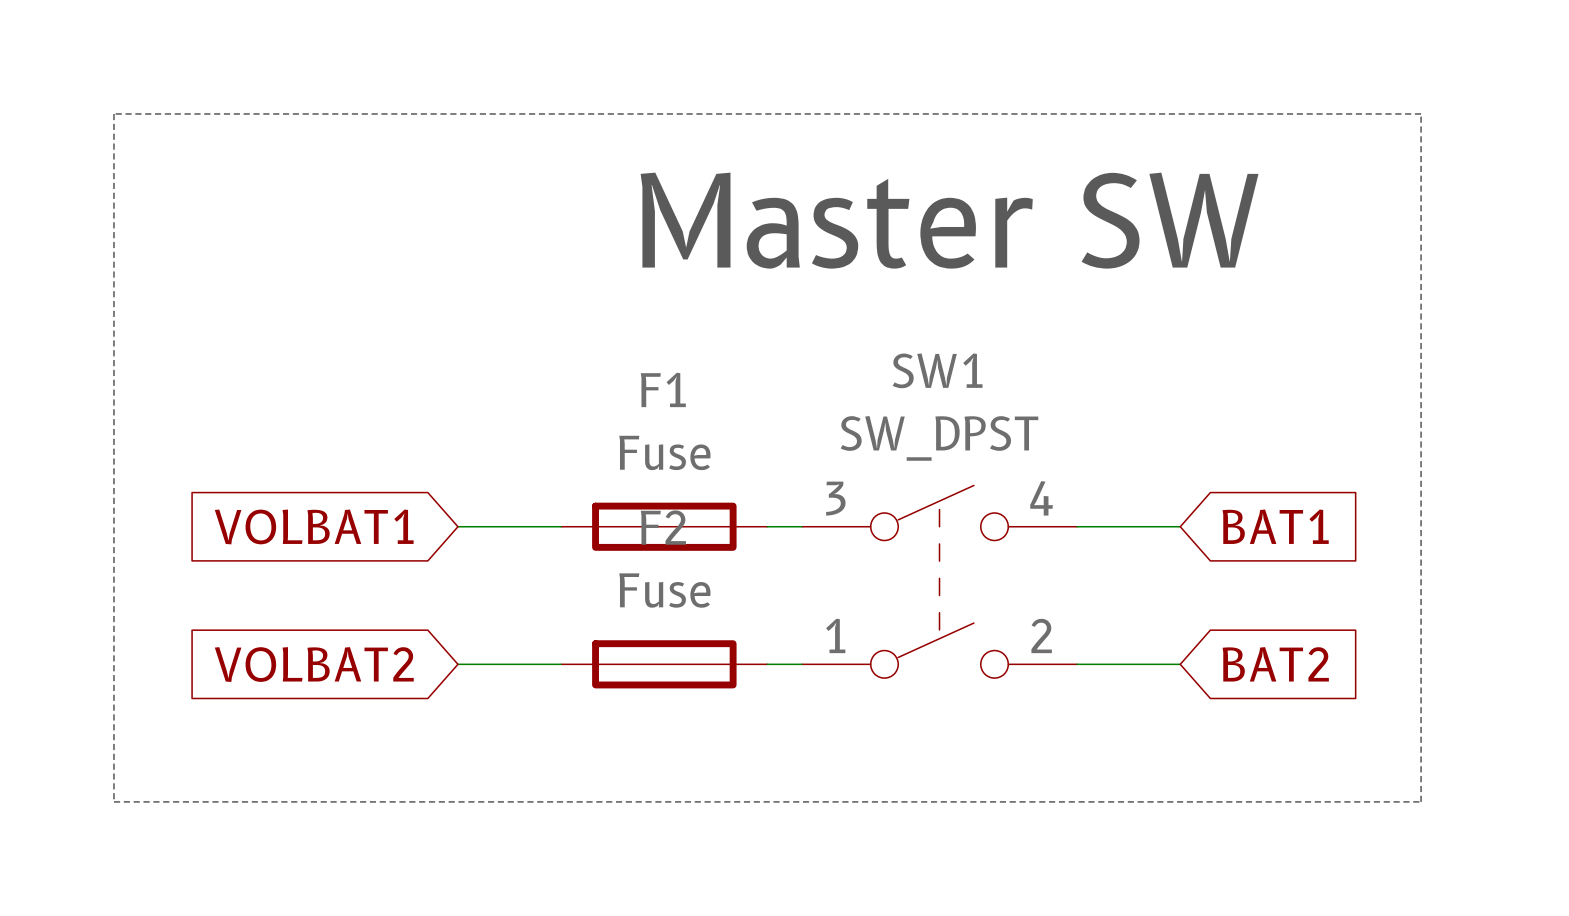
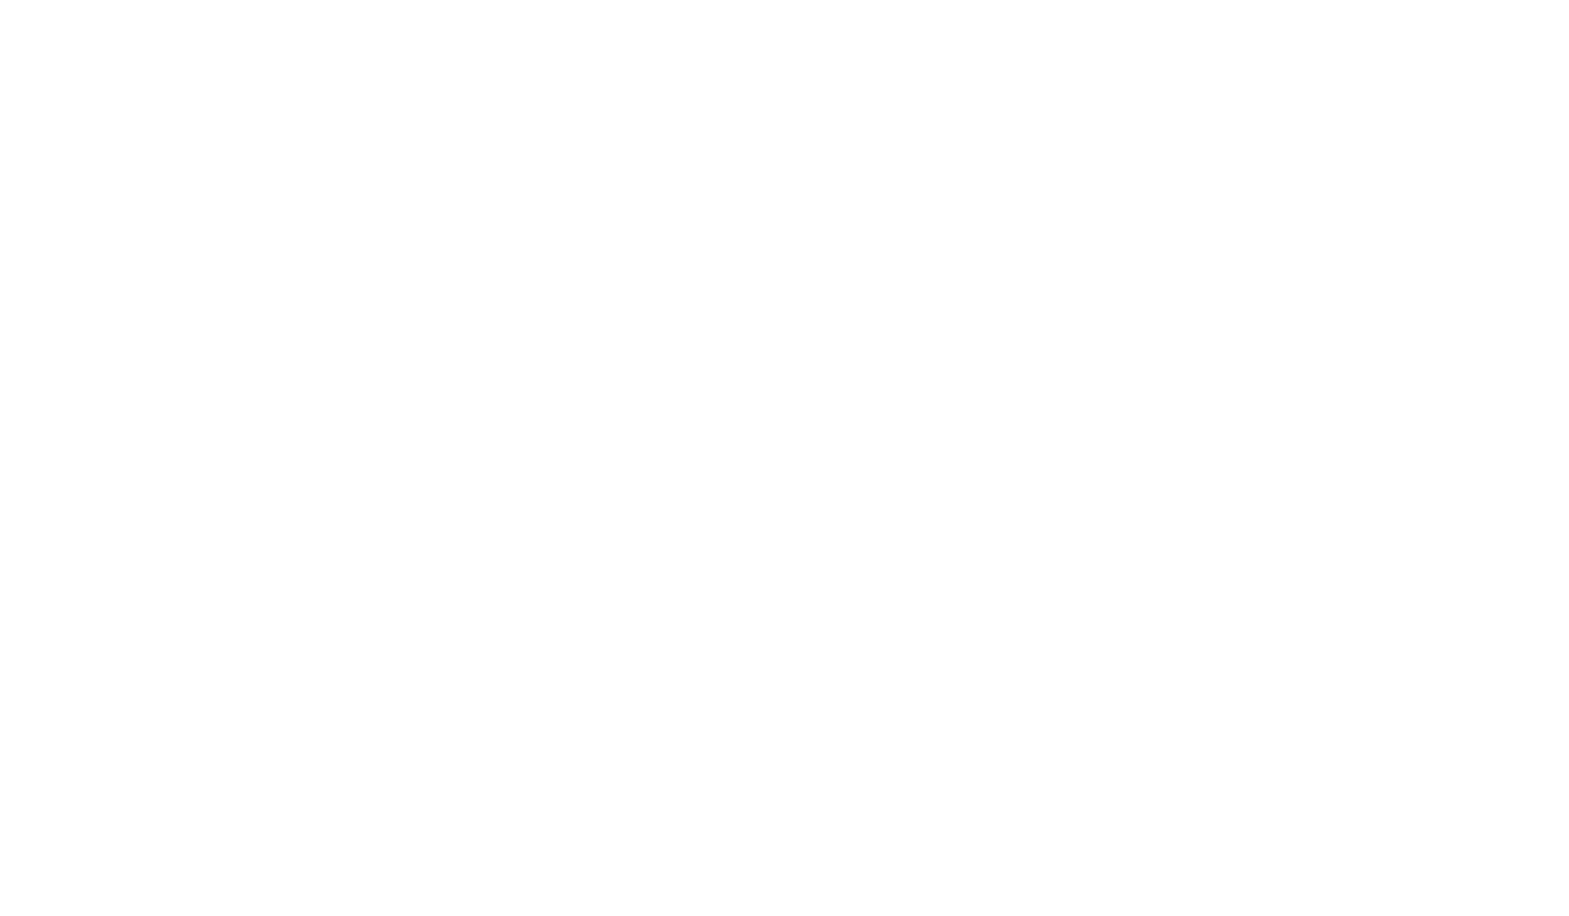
line: (113, 113) (1421, 113) (1421, 801) (113, 801) (113, 113) -> none
text: Master SW (949, 220) -> none
global label: VOLBAT1 (314, 526) -> none
wire: (457, 526) (561, 526) -> none
F1: Fuse (664, 526) -> none
wire: (767, 526) (801, 526) -> none
wire: (1077, 526) (1180, 526) -> none
global label: BAT1 (1275, 526) -> none
SW1: SW_DPST (939, 581) -> none
global label: VOLBAT2 (314, 664) -> none
wire: (457, 664) (561, 664) -> none
F2: Fuse (664, 664) -> none
wire: (767, 664) (801, 664) -> none
wire: (1077, 664) (1180, 664) -> none
global label: BAT2 (1275, 664) -> none

